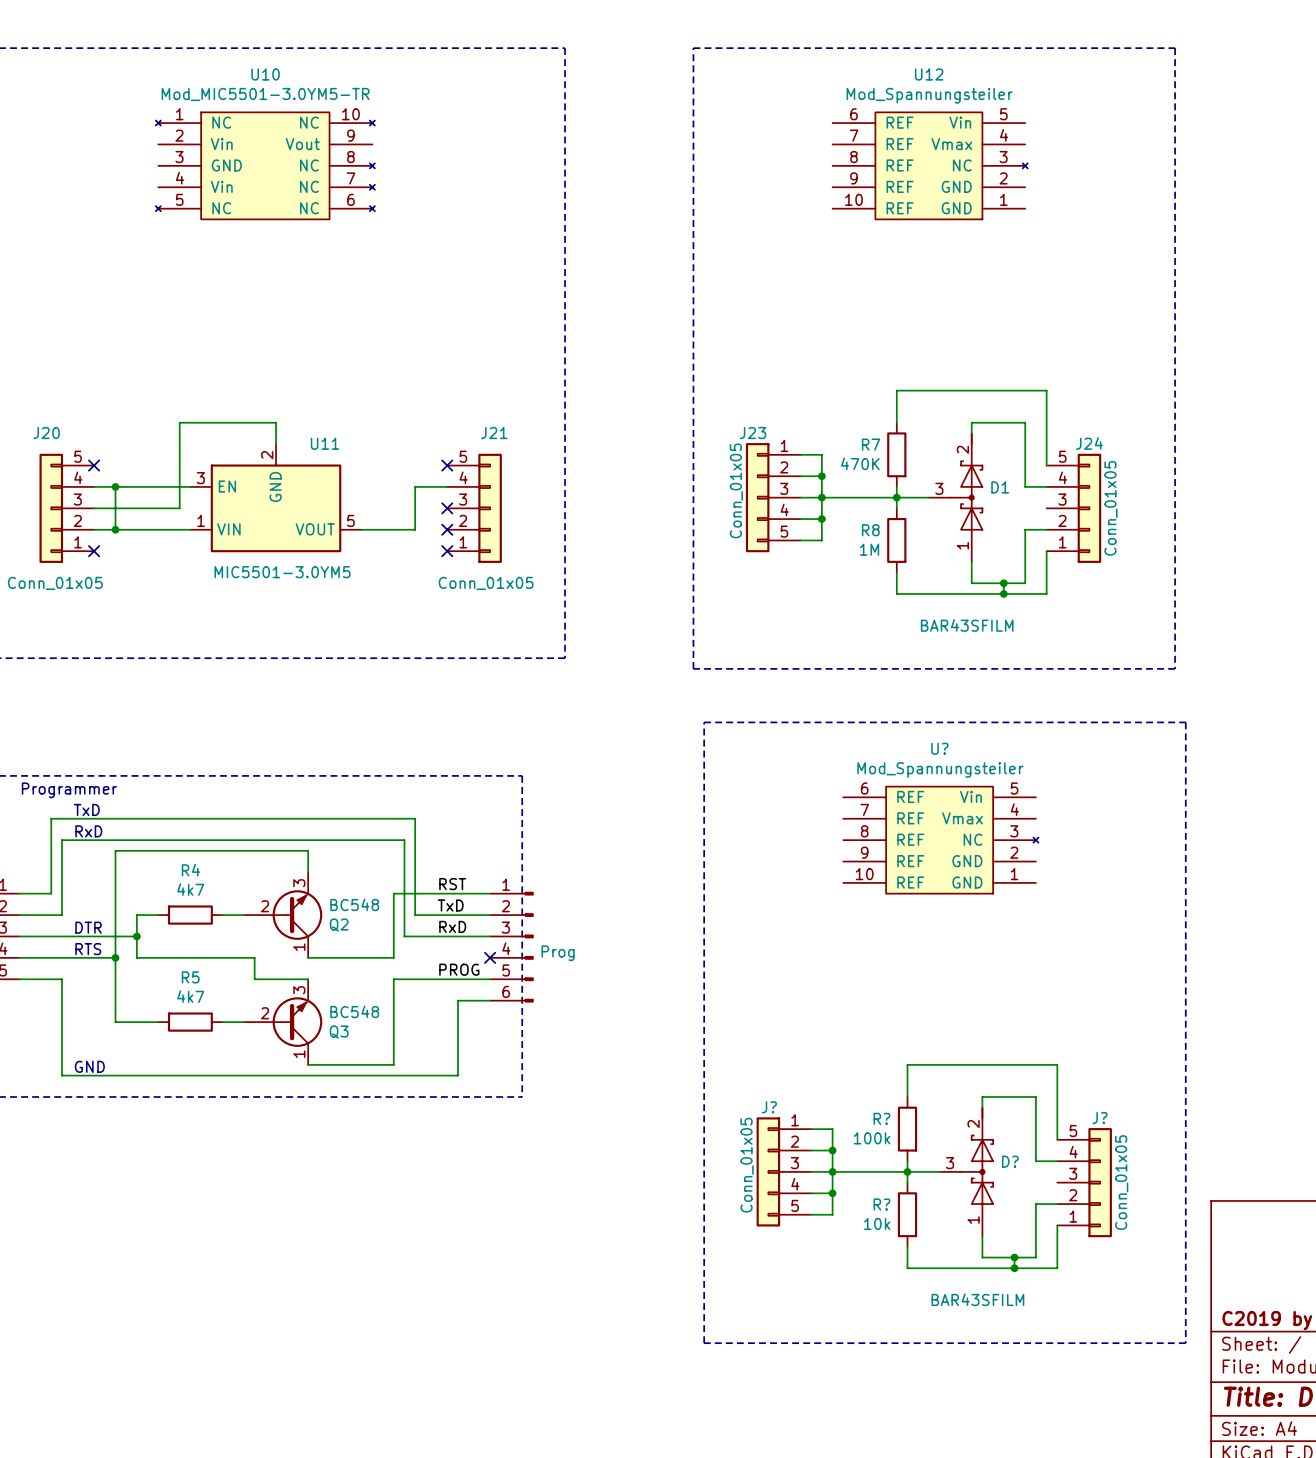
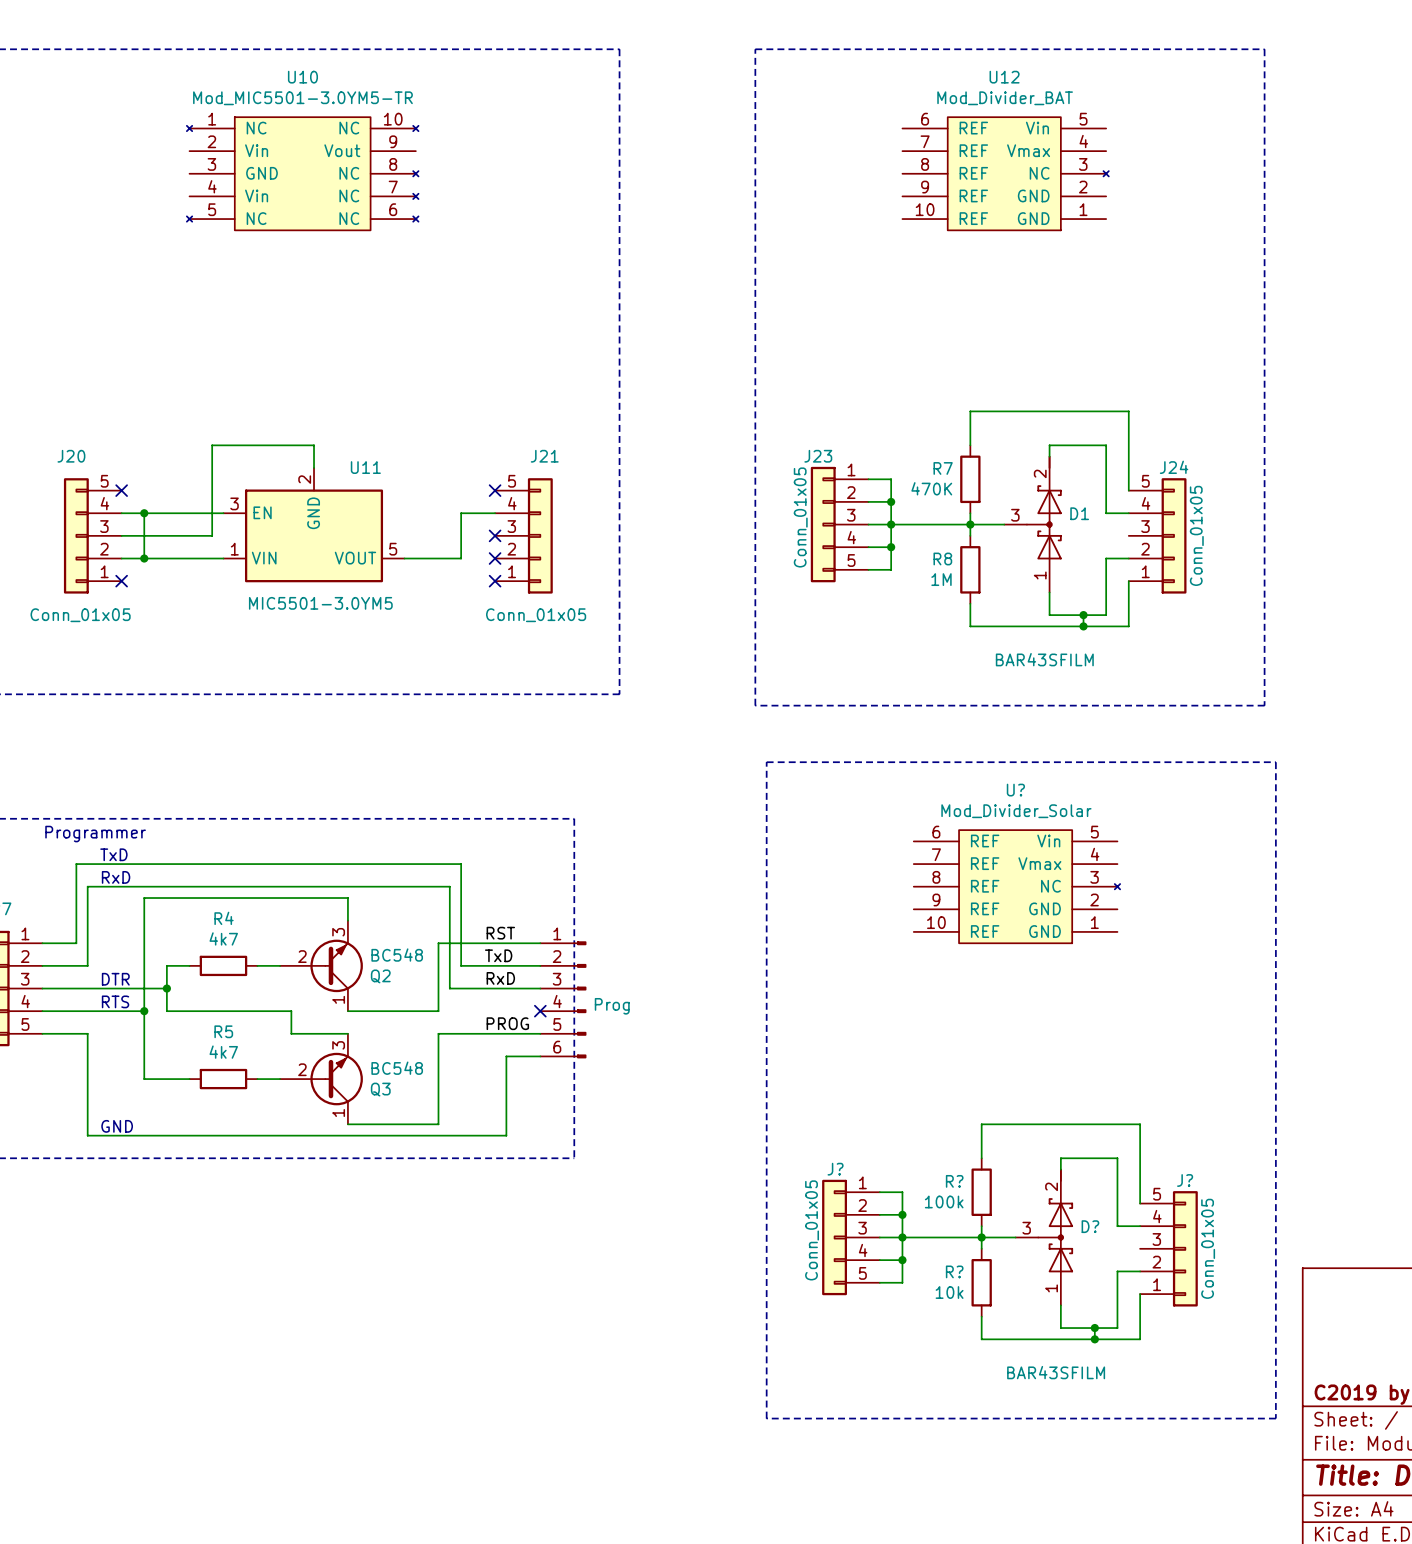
U12 value: Mod_Spannungsteiler (929, 95) -> Mod_Divider_BAT (1005, 98)
U? value: Mod_Spannungsteiler (940, 770) -> Mod_Divider_Solar (1016, 811)

